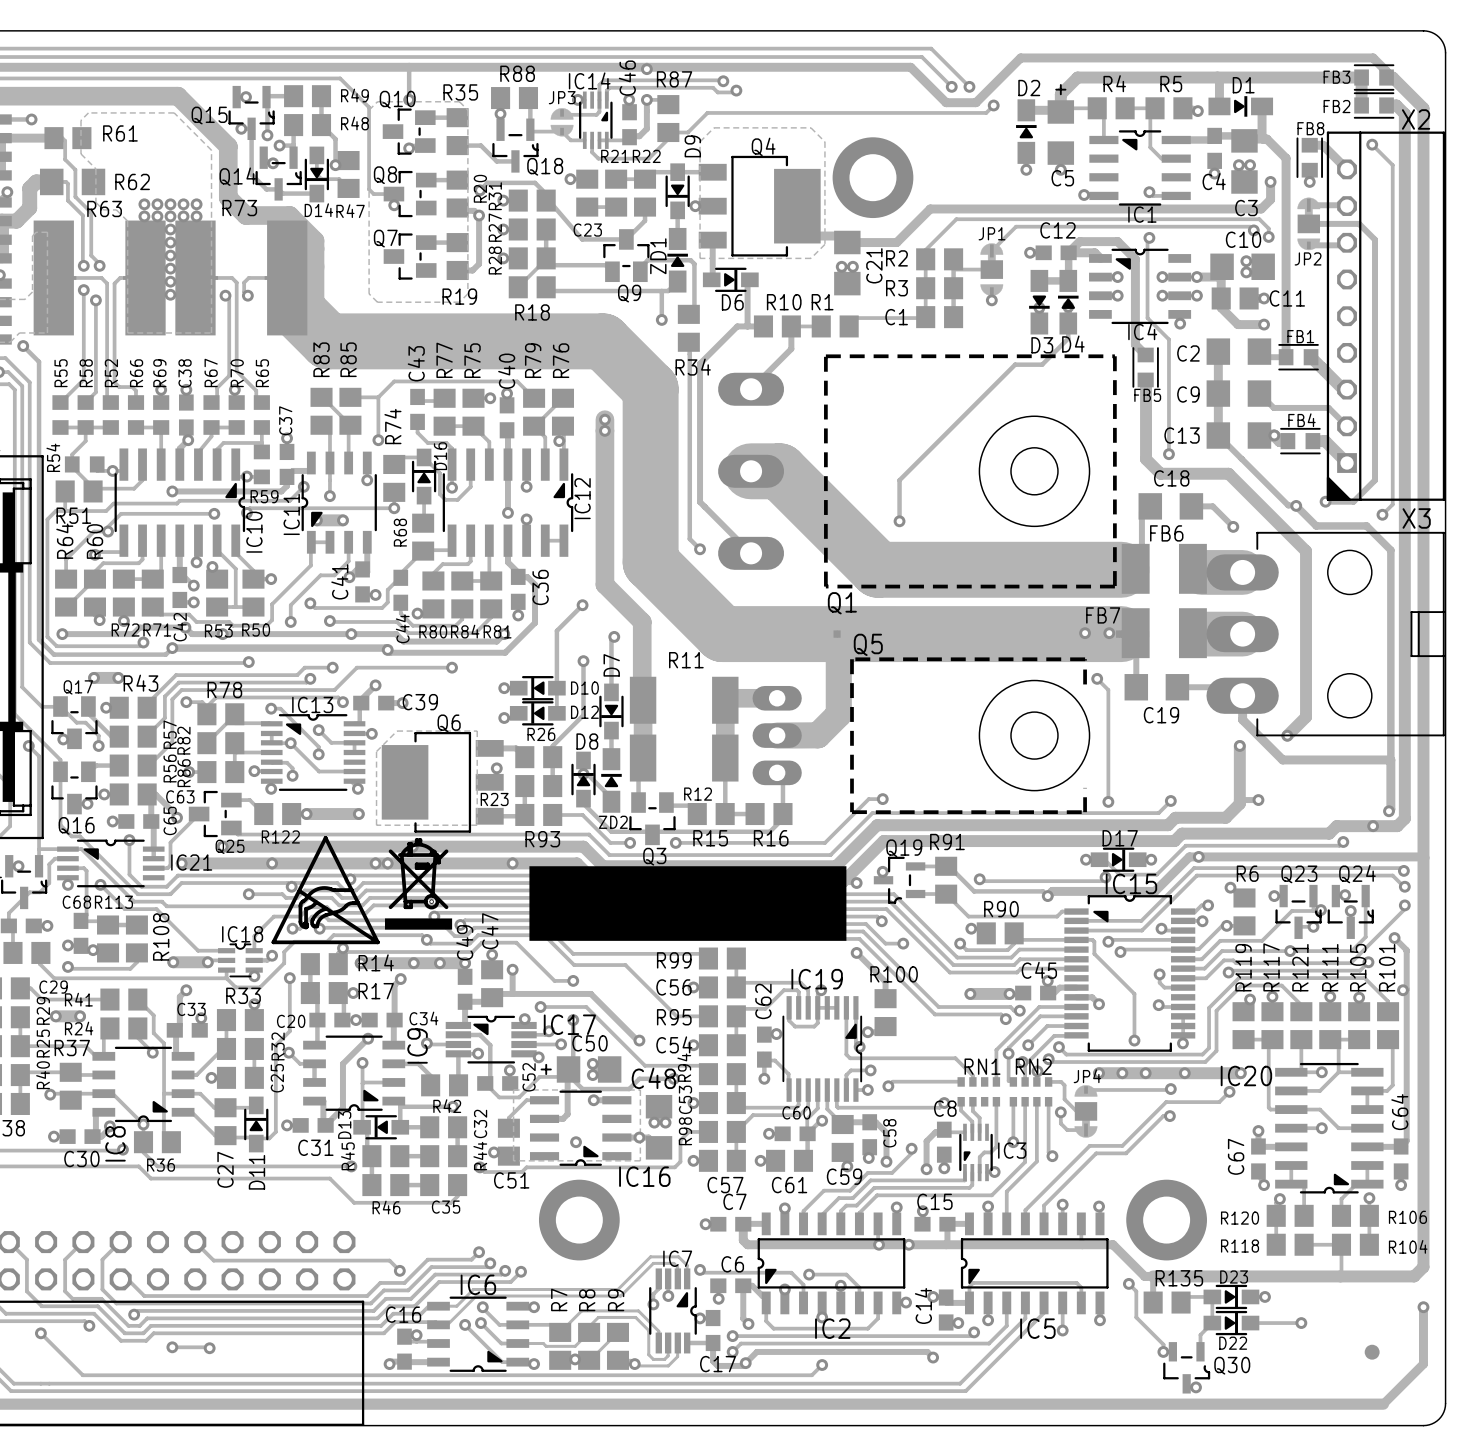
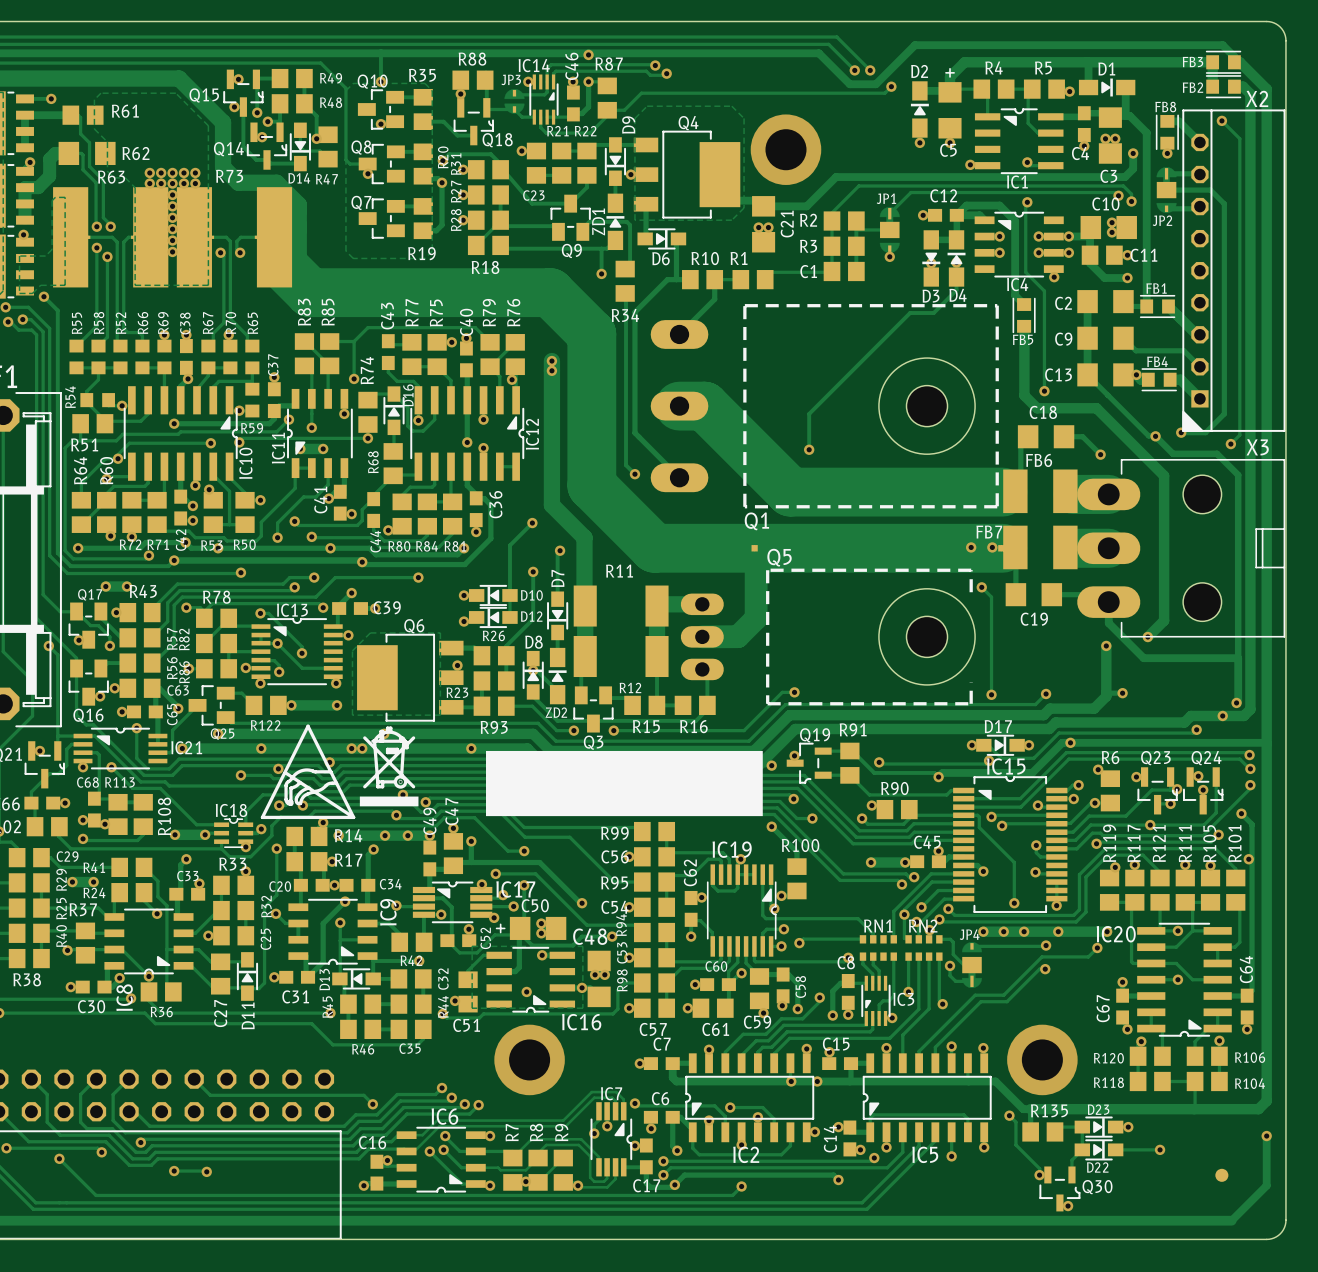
track: (318, 730) (331, 742) (354, 742) (354, 752) -> none
via: (318, 730) -> none

